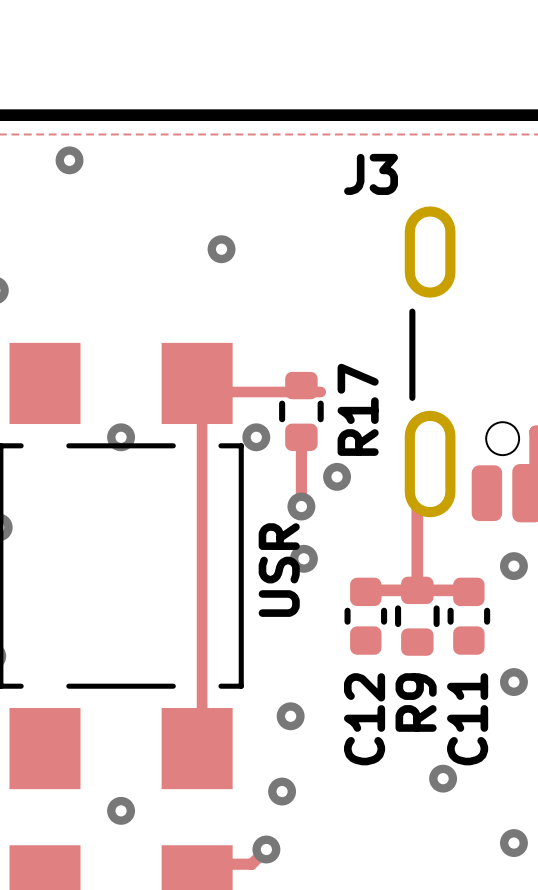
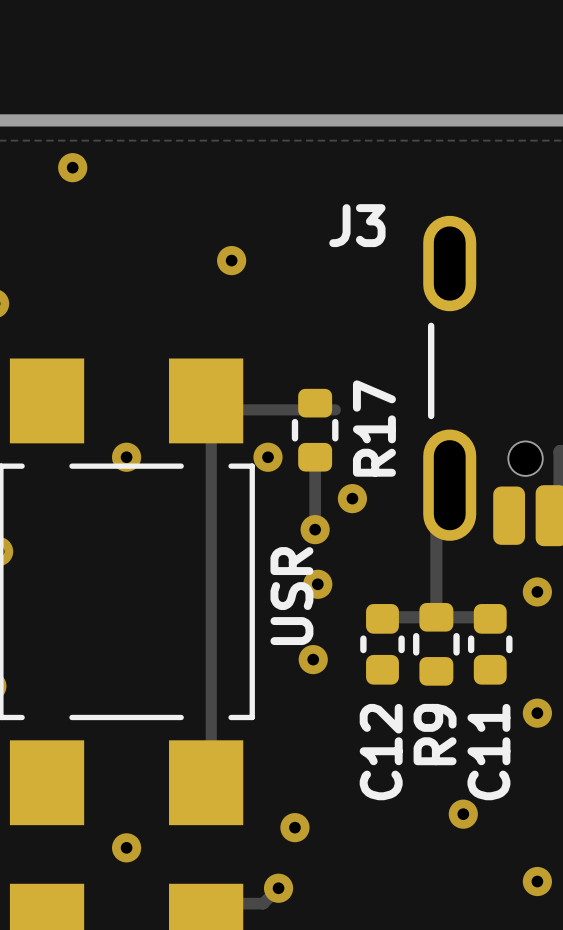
J3 name position: J3 (371, 174) -> J3 (357, 225)
via position: (290, 716) -> (313, 659)

